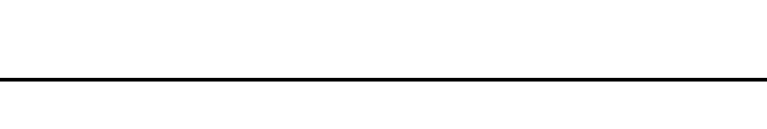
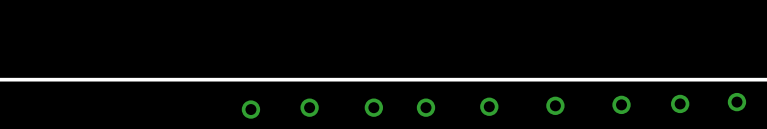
via: none -> (736, 102)
via: none -> (680, 103)
via: none -> (621, 104)
via: none -> (555, 105)
via: none -> (489, 106)
via: none -> (309, 107)
via: none -> (373, 107)
via: none -> (425, 107)
via: none -> (250, 109)

